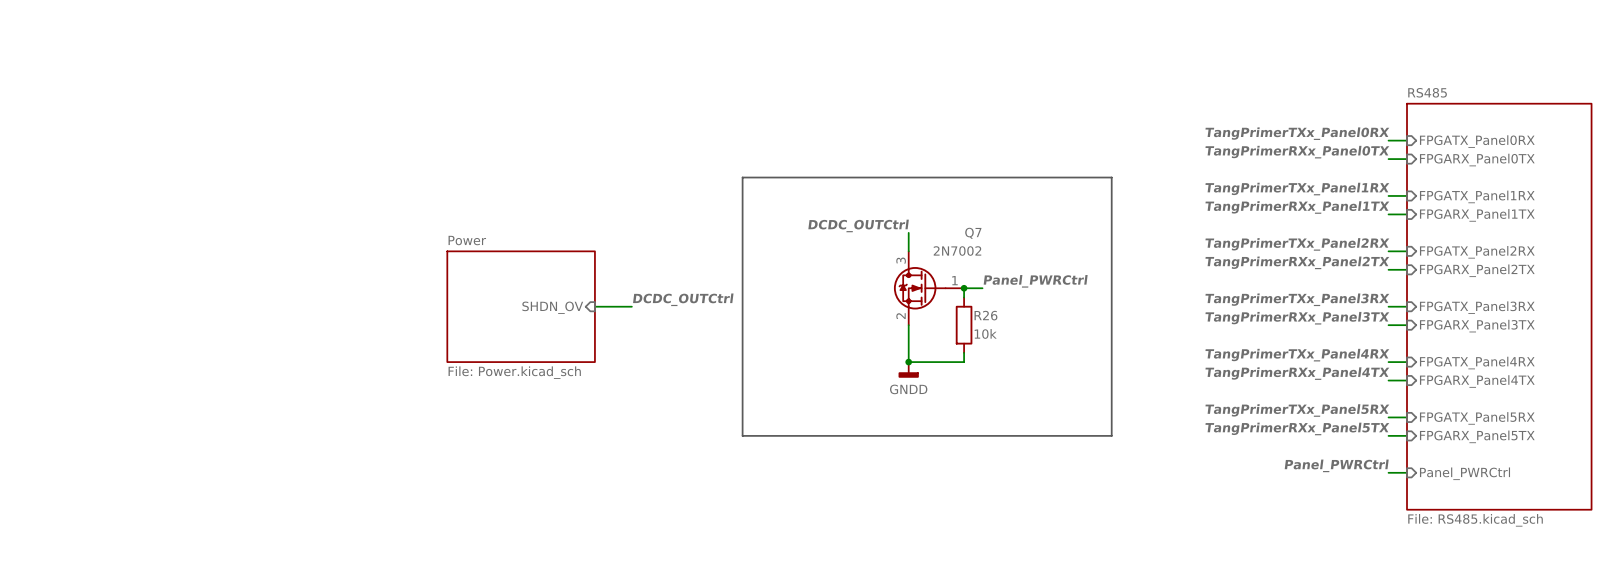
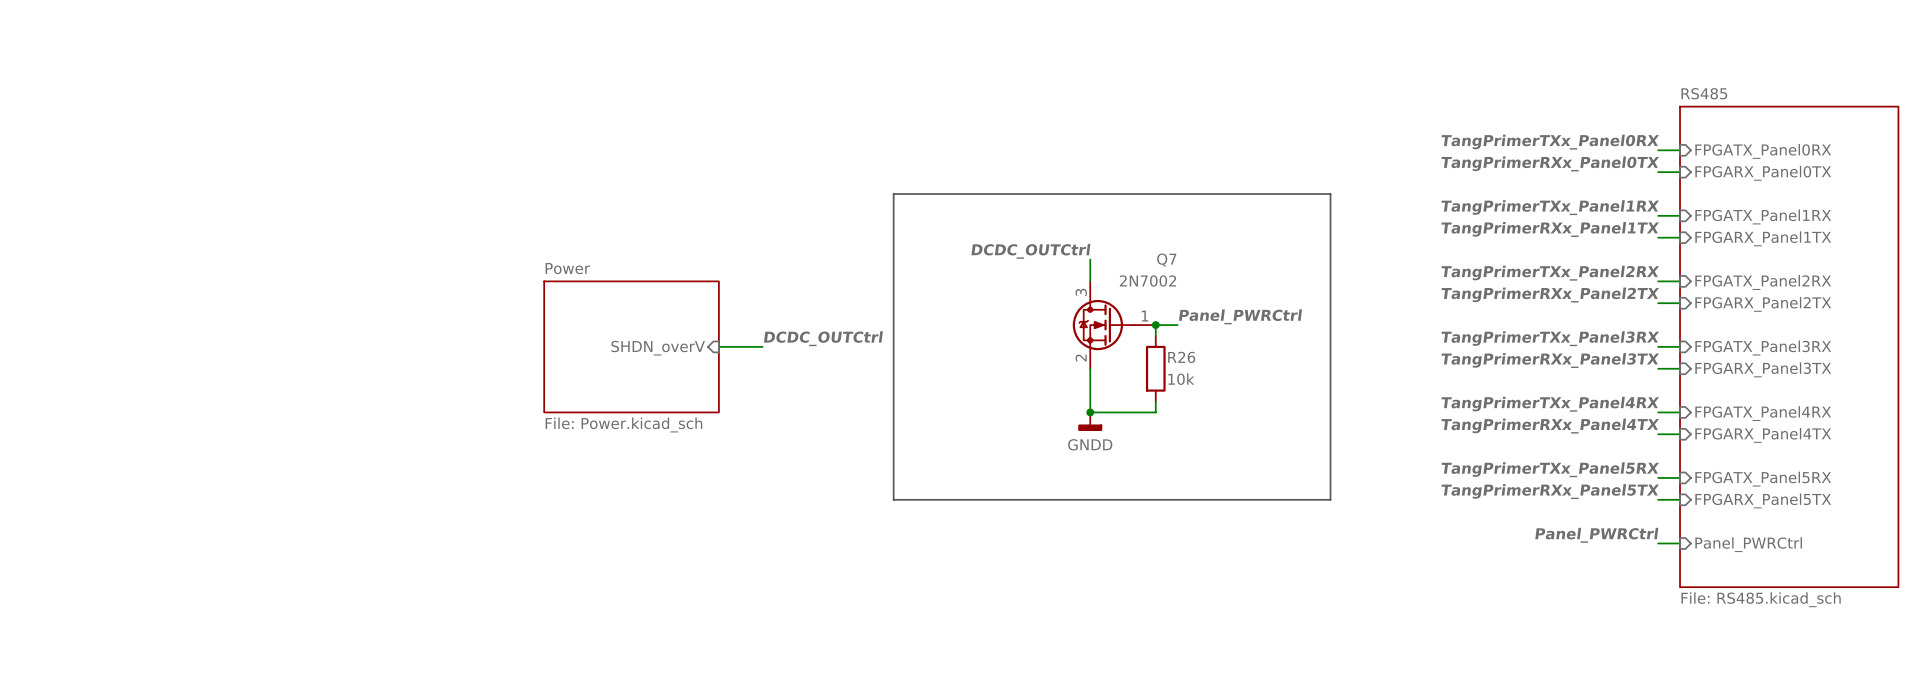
sheet pin: SHDN_OV (552, 307) -> SHDN_overV (658, 348)

